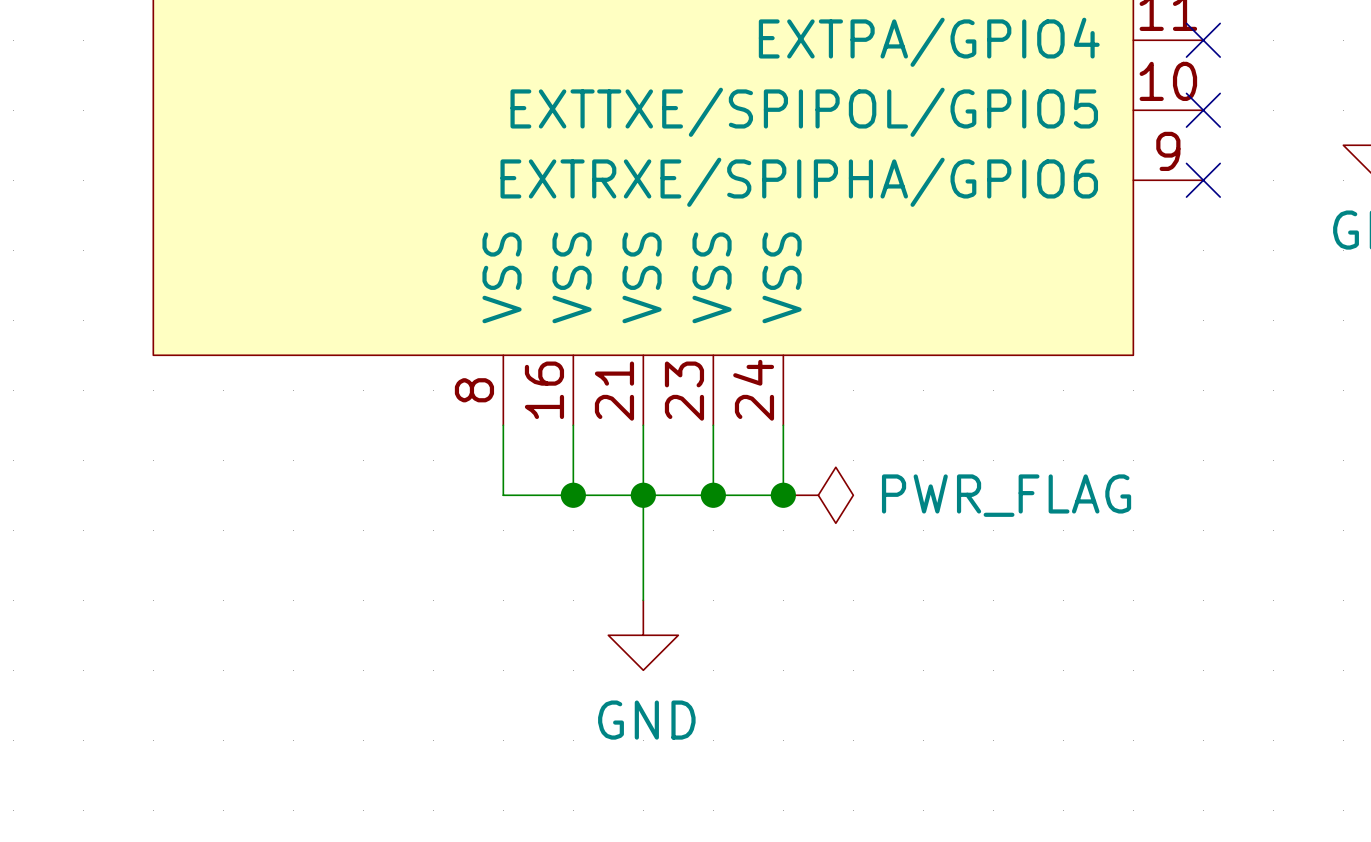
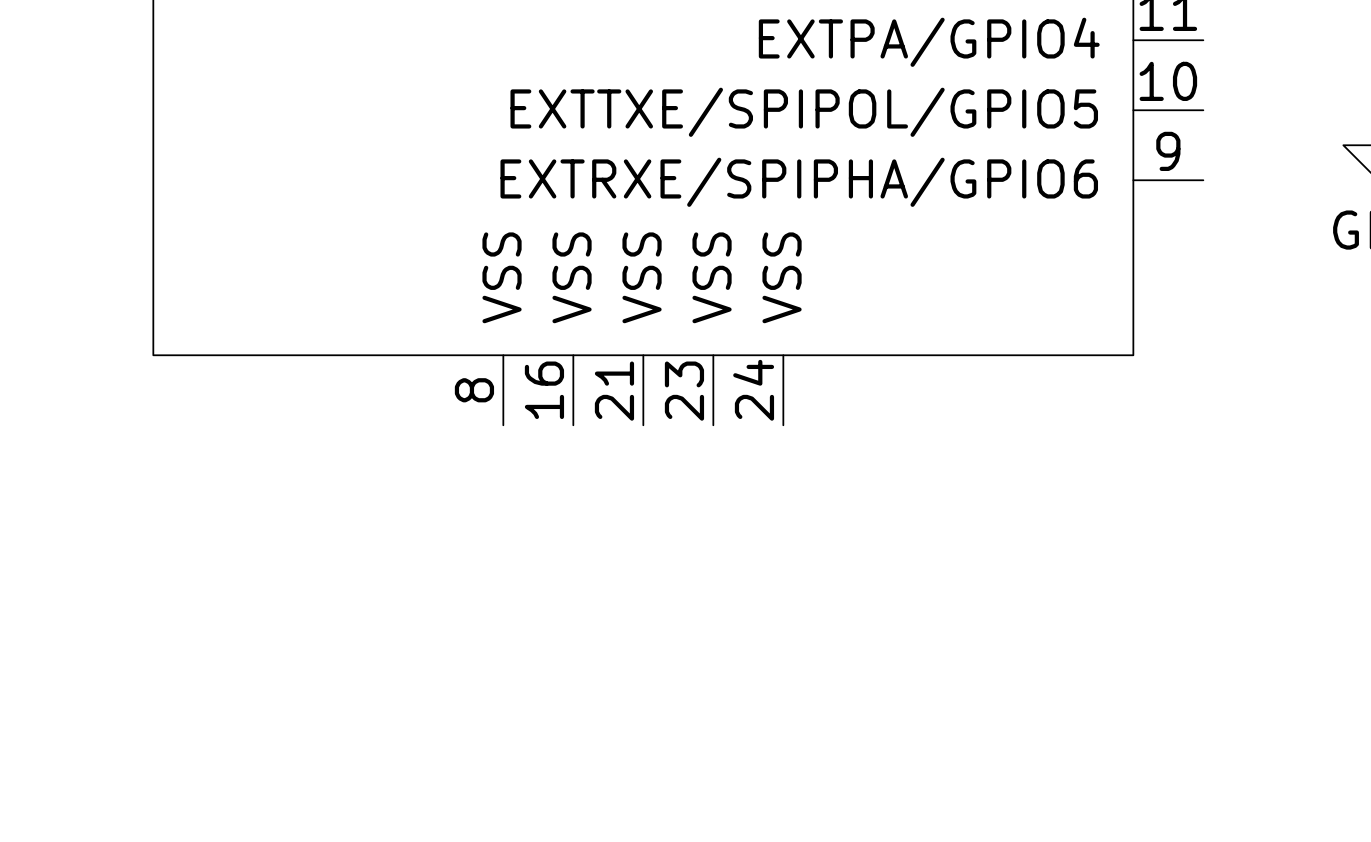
no-connect mark: (1203, 40) -> none
no-connect mark: (1203, 110) -> none
no-connect mark: (1203, 180) -> none
wire: (503, 425) (503, 495) (783, 495) (783, 425) -> none
wire: (573, 425) (573, 495) -> none
wire: (643, 425) (643, 600) -> none
wire: (713, 425) (713, 495) -> none
junction: (573, 495) -> none
junction: (643, 495) -> none
junction: (713, 495) -> none
junction: (783, 495) -> none
power symbol: PWR_FLAG (818, 495) -> none
power symbol: GND (643, 635) -> none

